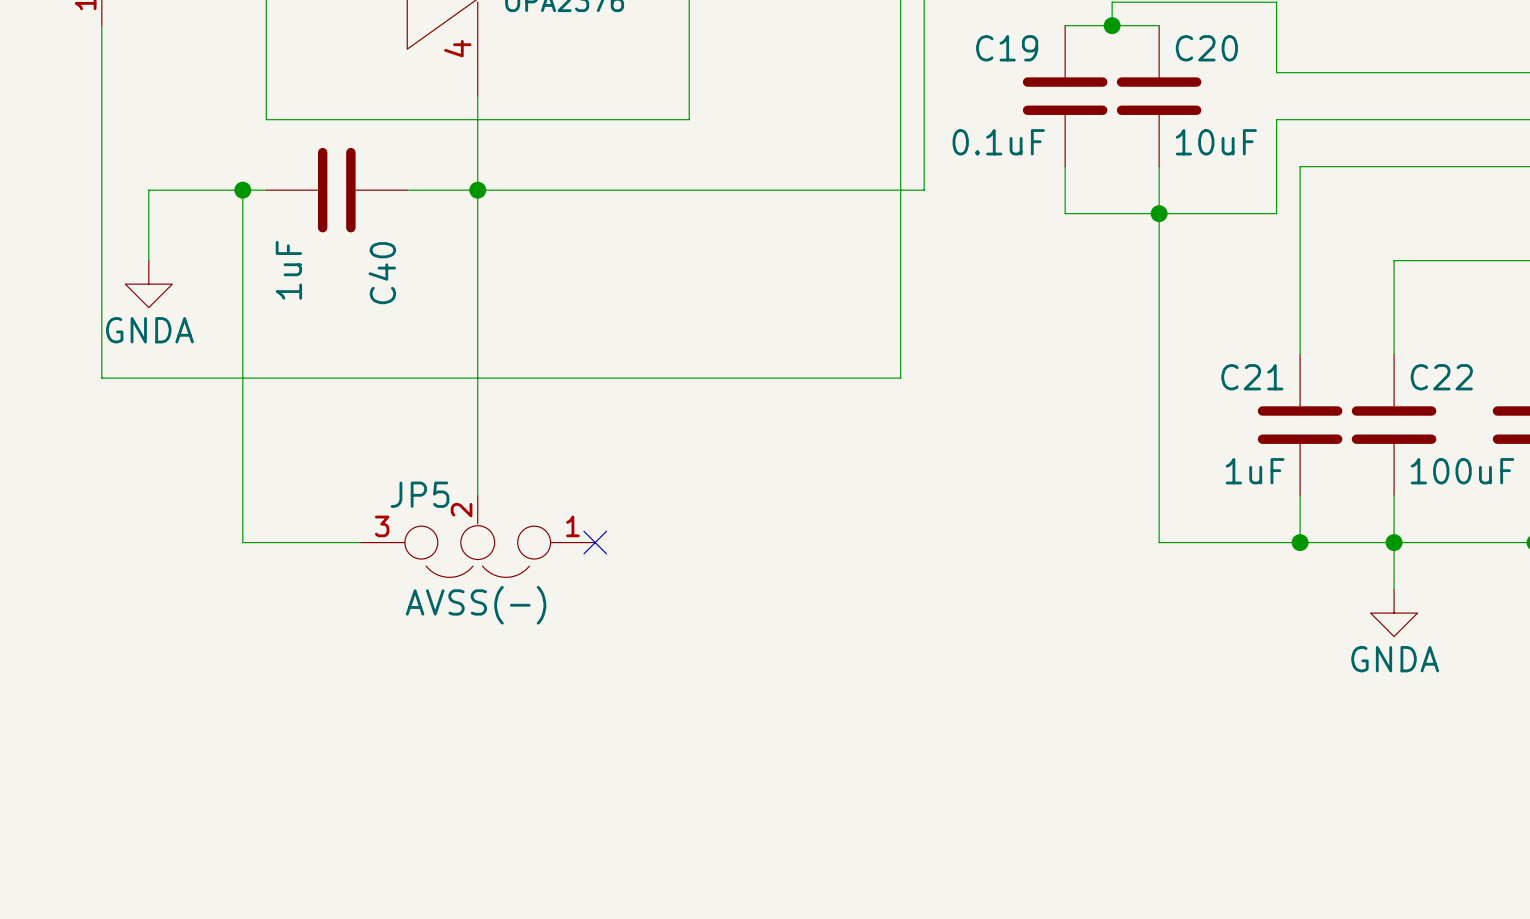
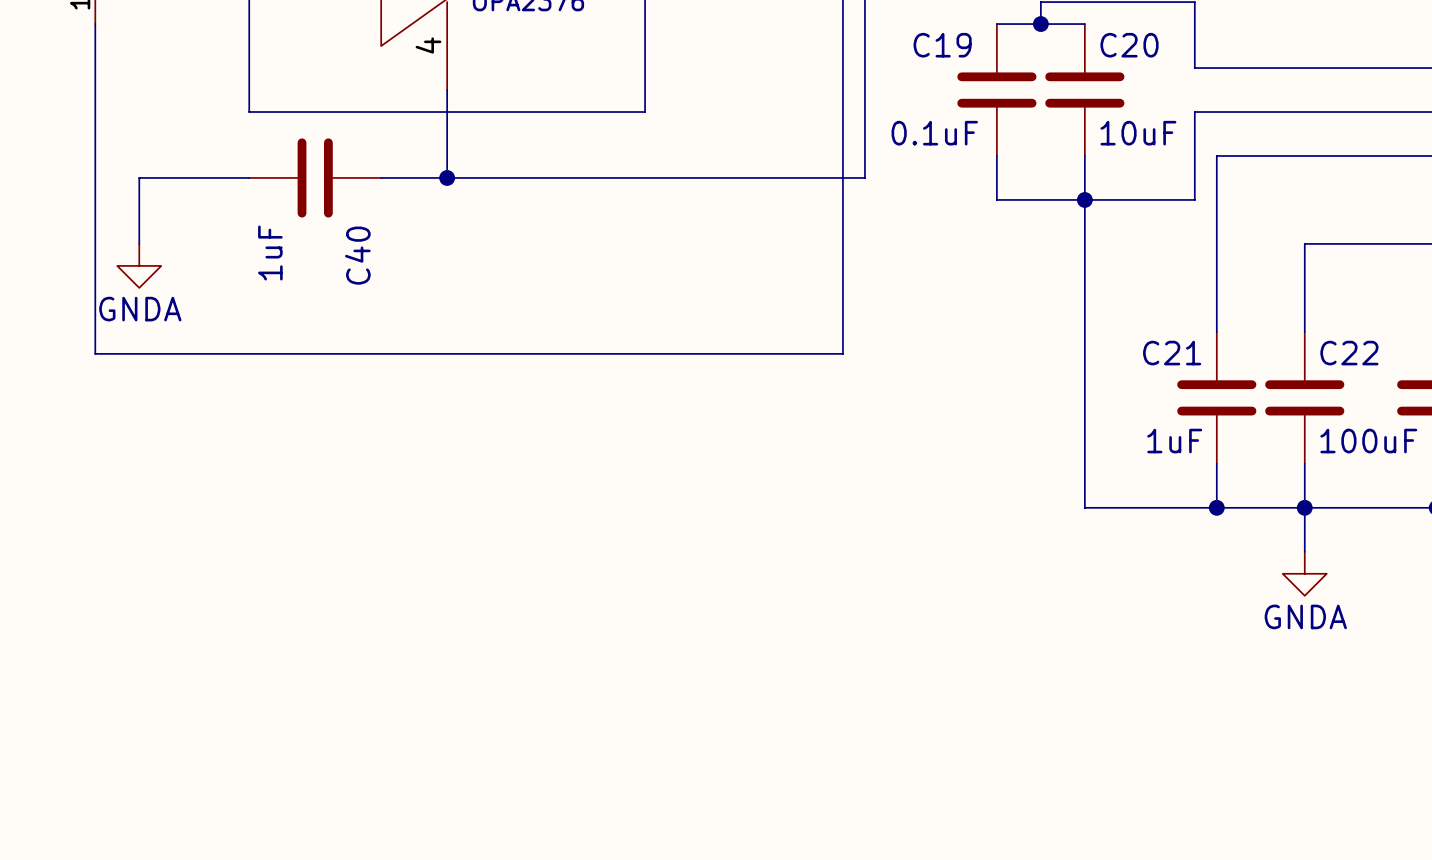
wire: (242, 190) (242, 542) (360, 542) -> none
junction: (242, 190) -> none
wire: (477, 190) (477, 495) -> none
JP5: AVSS(-) (477, 536) -> none
no-connect mark: (595, 542) -> none

